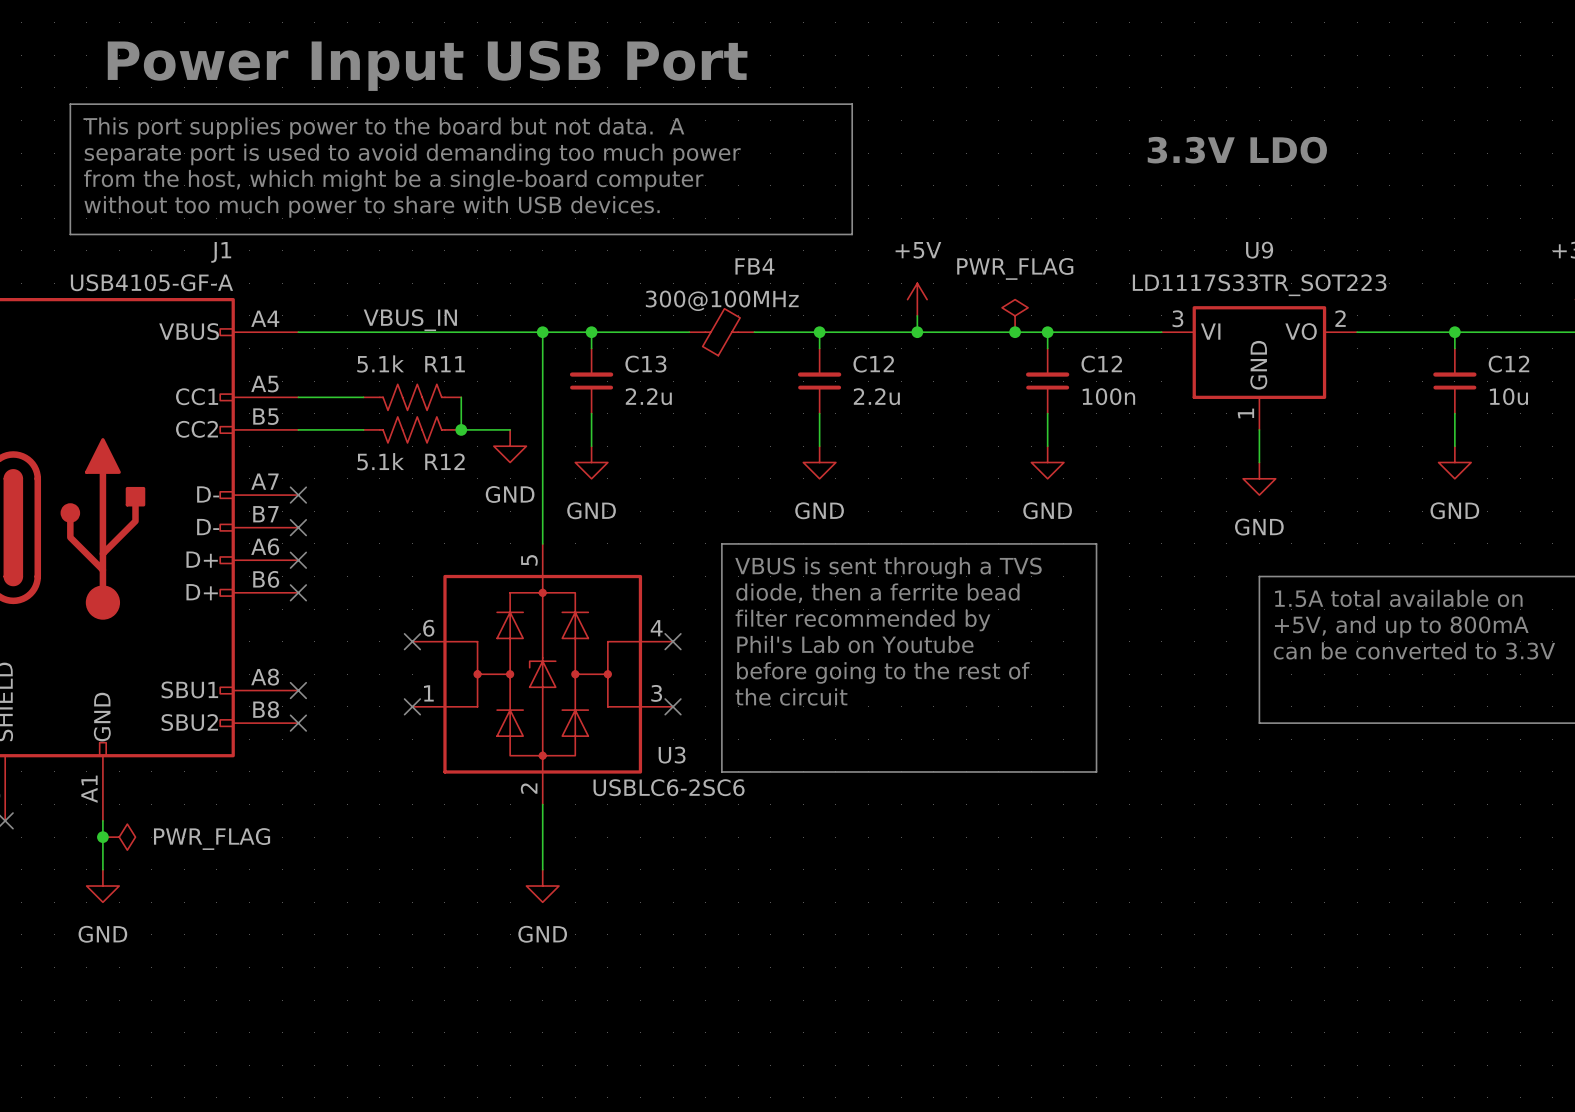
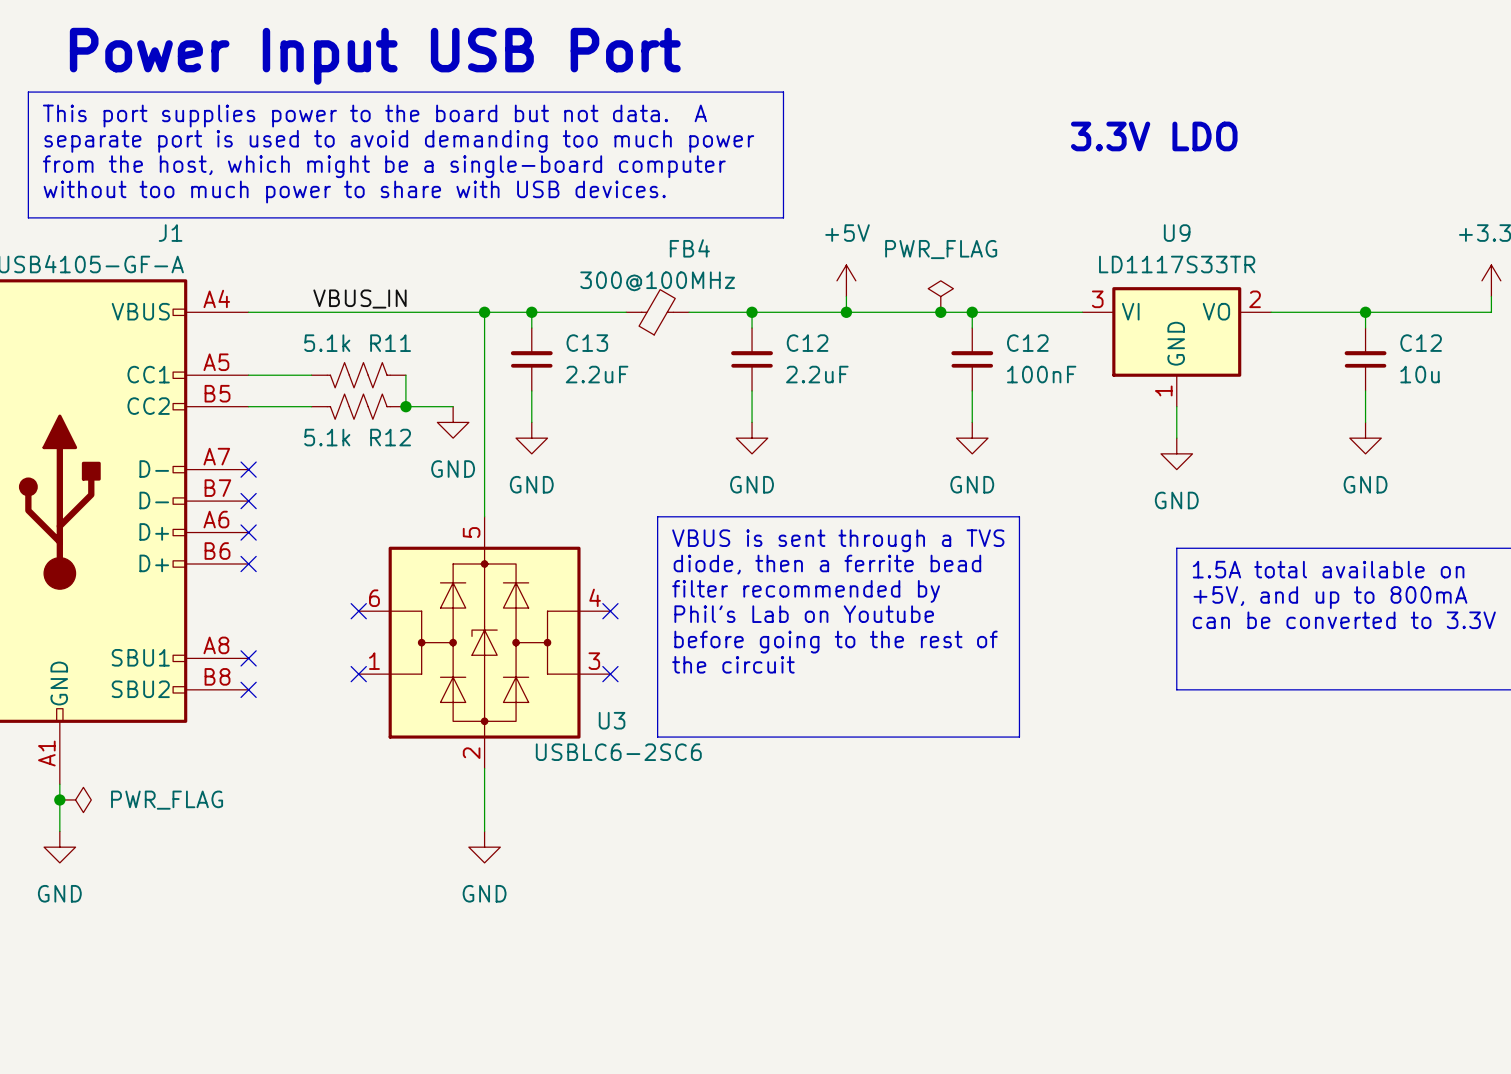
U9 value: LD1117S33TR_SOT223 (1259, 285) -> LD1117S33TR (1177, 264)
C13 value: 2.2u (648, 396) -> 2.2uF (597, 374)
C12 value: 2.2u (876, 396) -> 2.2uF (817, 374)
C12 value: 100n (1108, 396) -> 100nF (1041, 374)

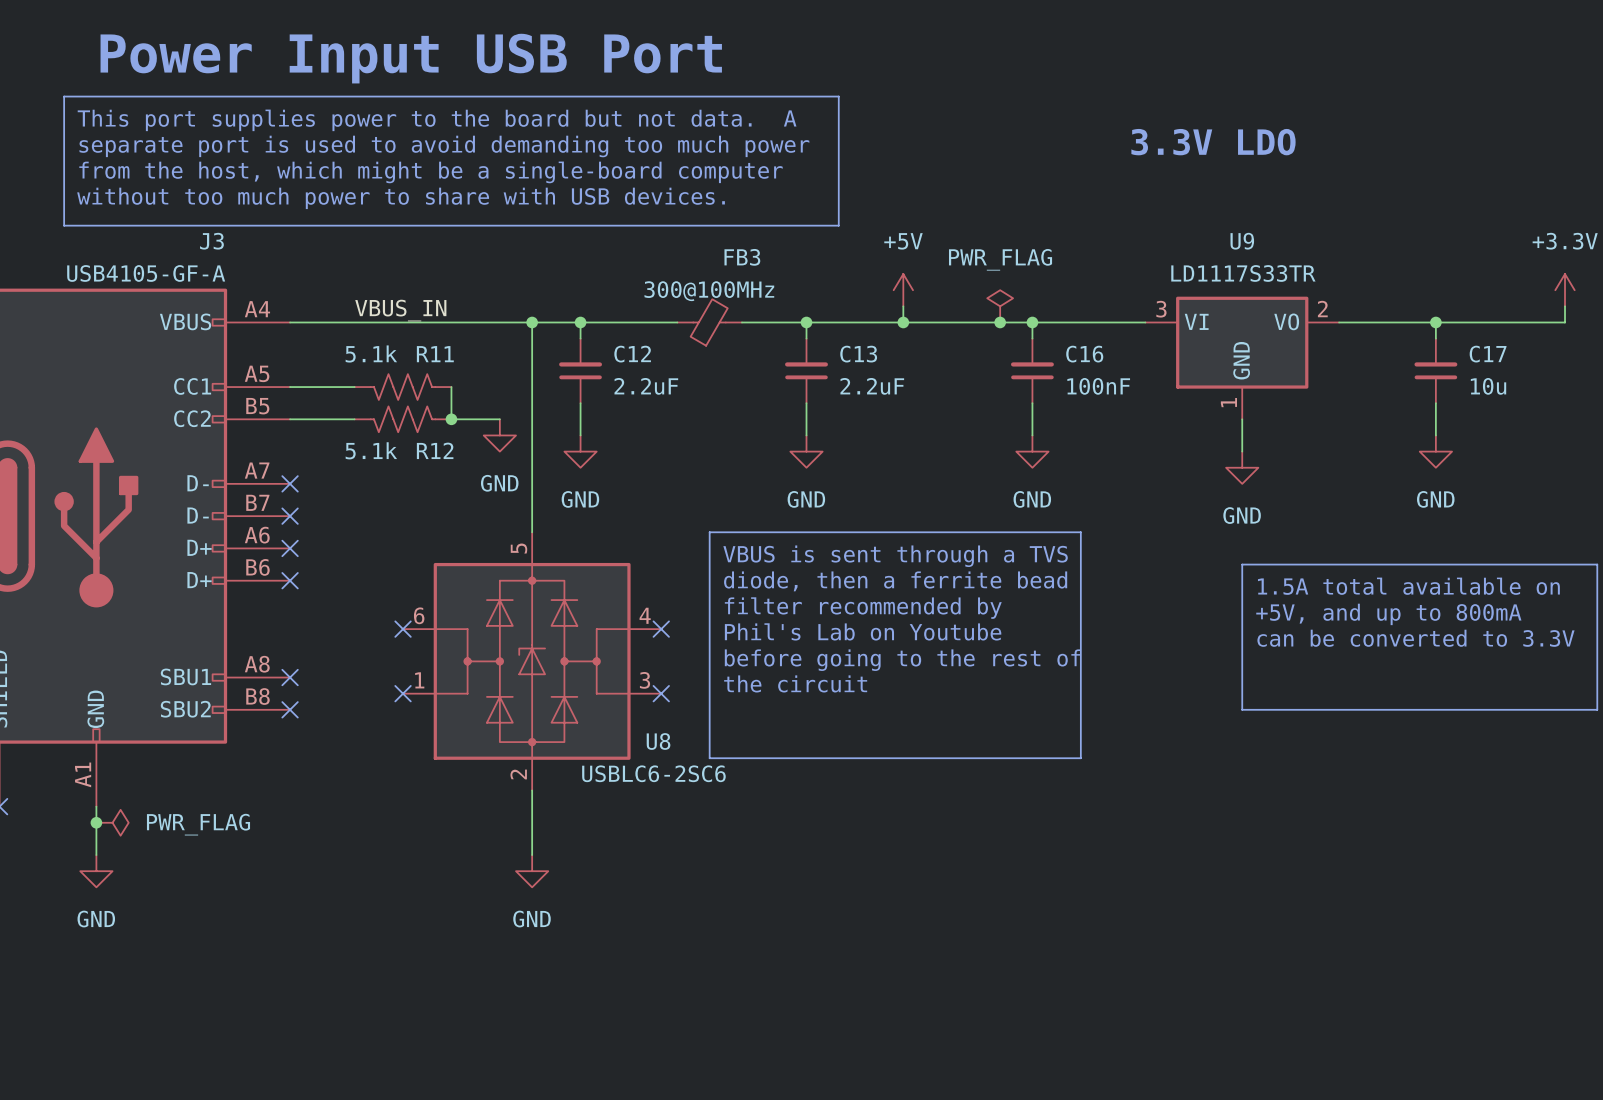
J1 name: J1 (170, 233) -> J3 (211, 241)
FB4 name: FB4 (689, 248) -> FB3 (742, 257)
C13 name: C13 (587, 343) -> C12 (632, 354)
C12 name: C12 (807, 343) -> C13 (858, 354)
C12 name: C12 (1027, 343) -> C16 (1084, 354)
C12 name: C12 (1421, 343) -> C17 (1488, 354)
U3 name: U3 (612, 720) -> U8 (658, 741)

